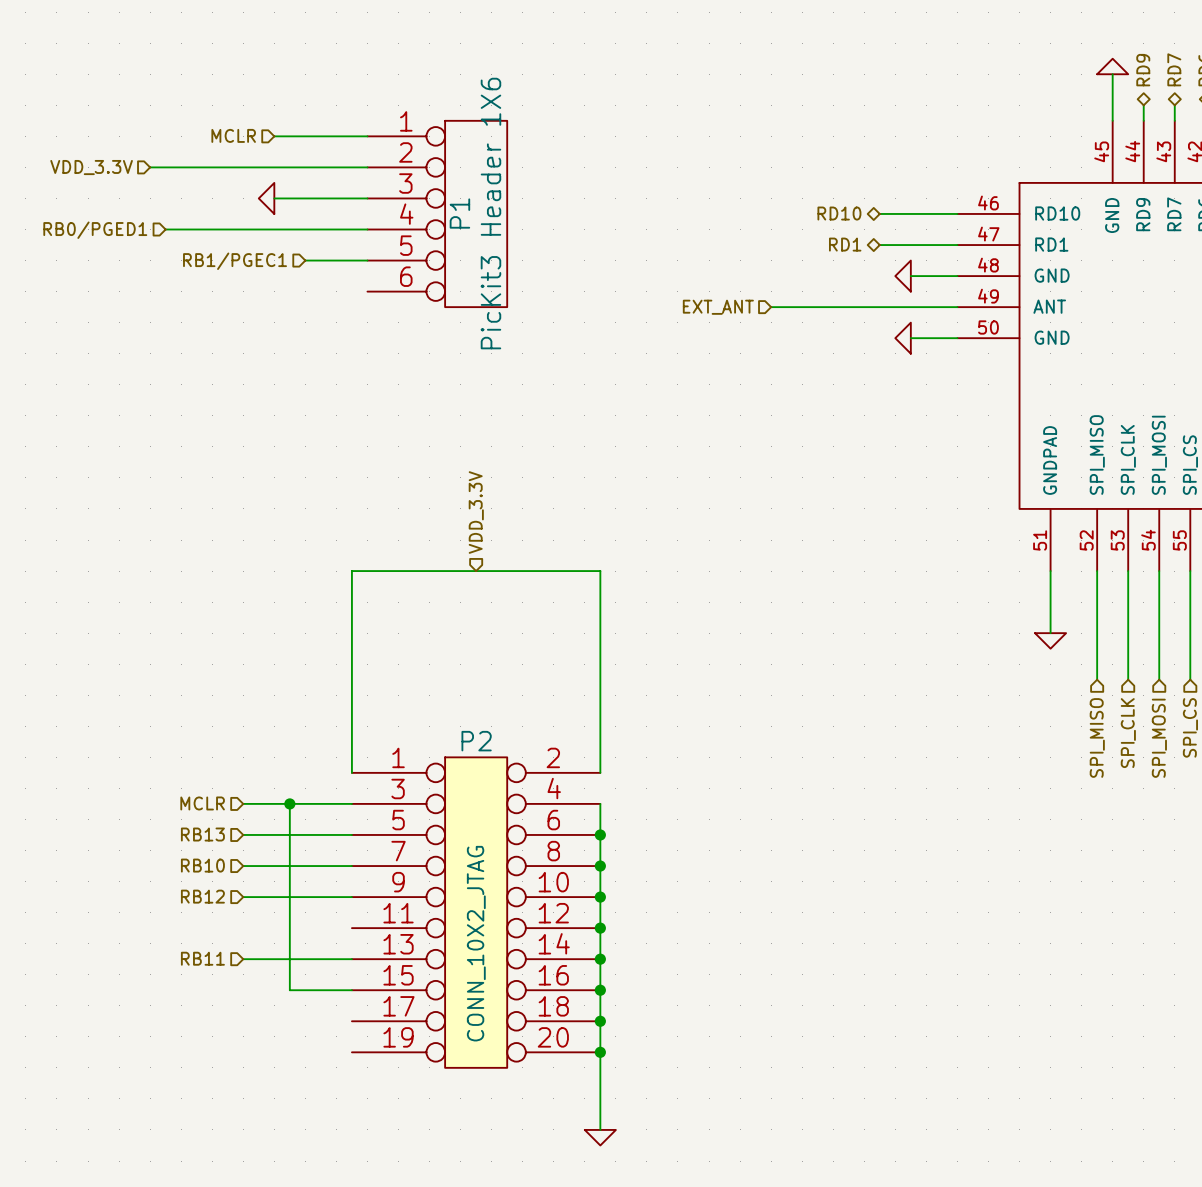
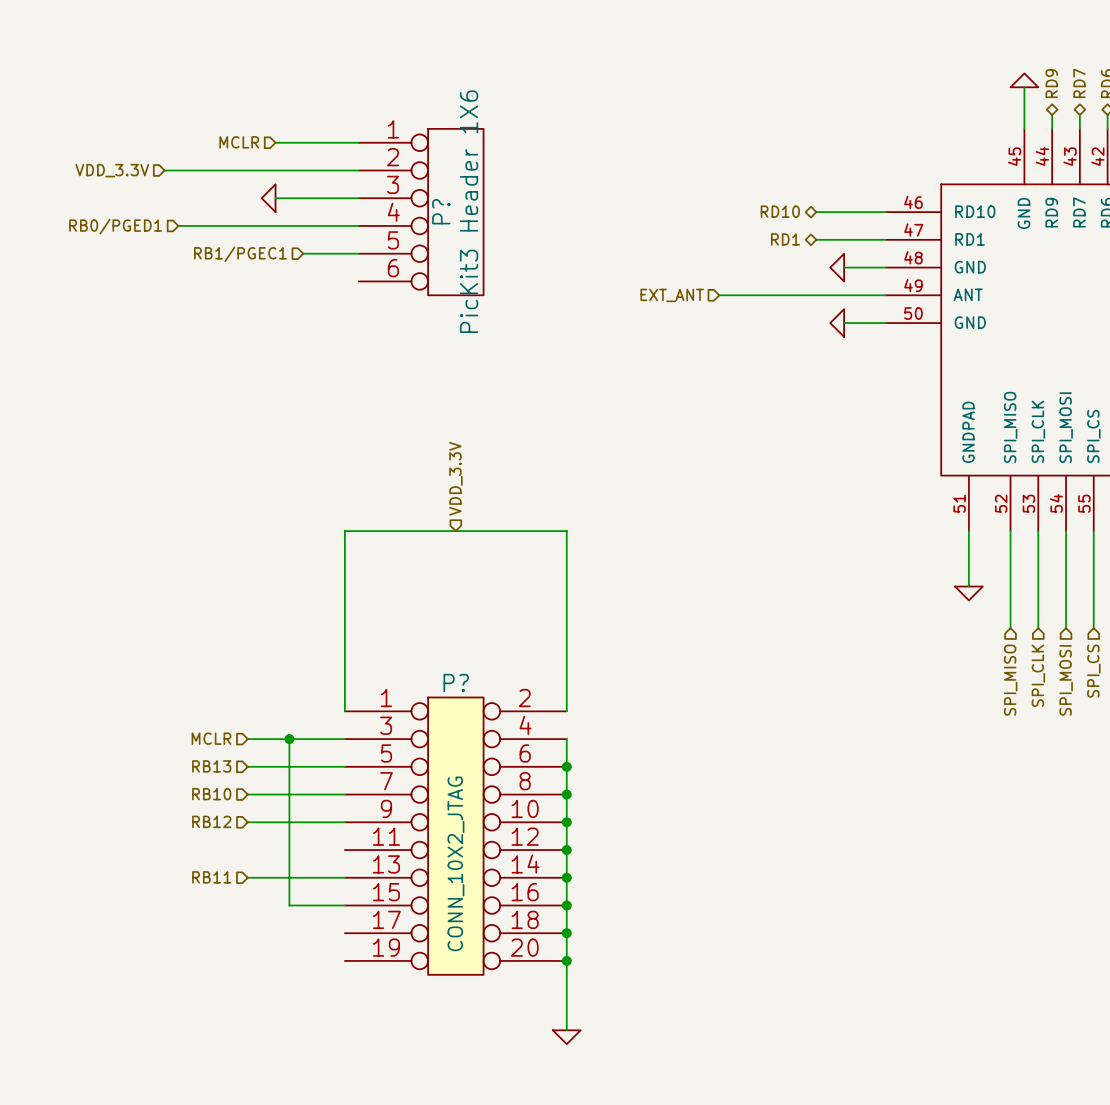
P1 name: P1 (459, 213) -> P? (441, 211)
P2 name: P2 (476, 741) -> P? (456, 682)

